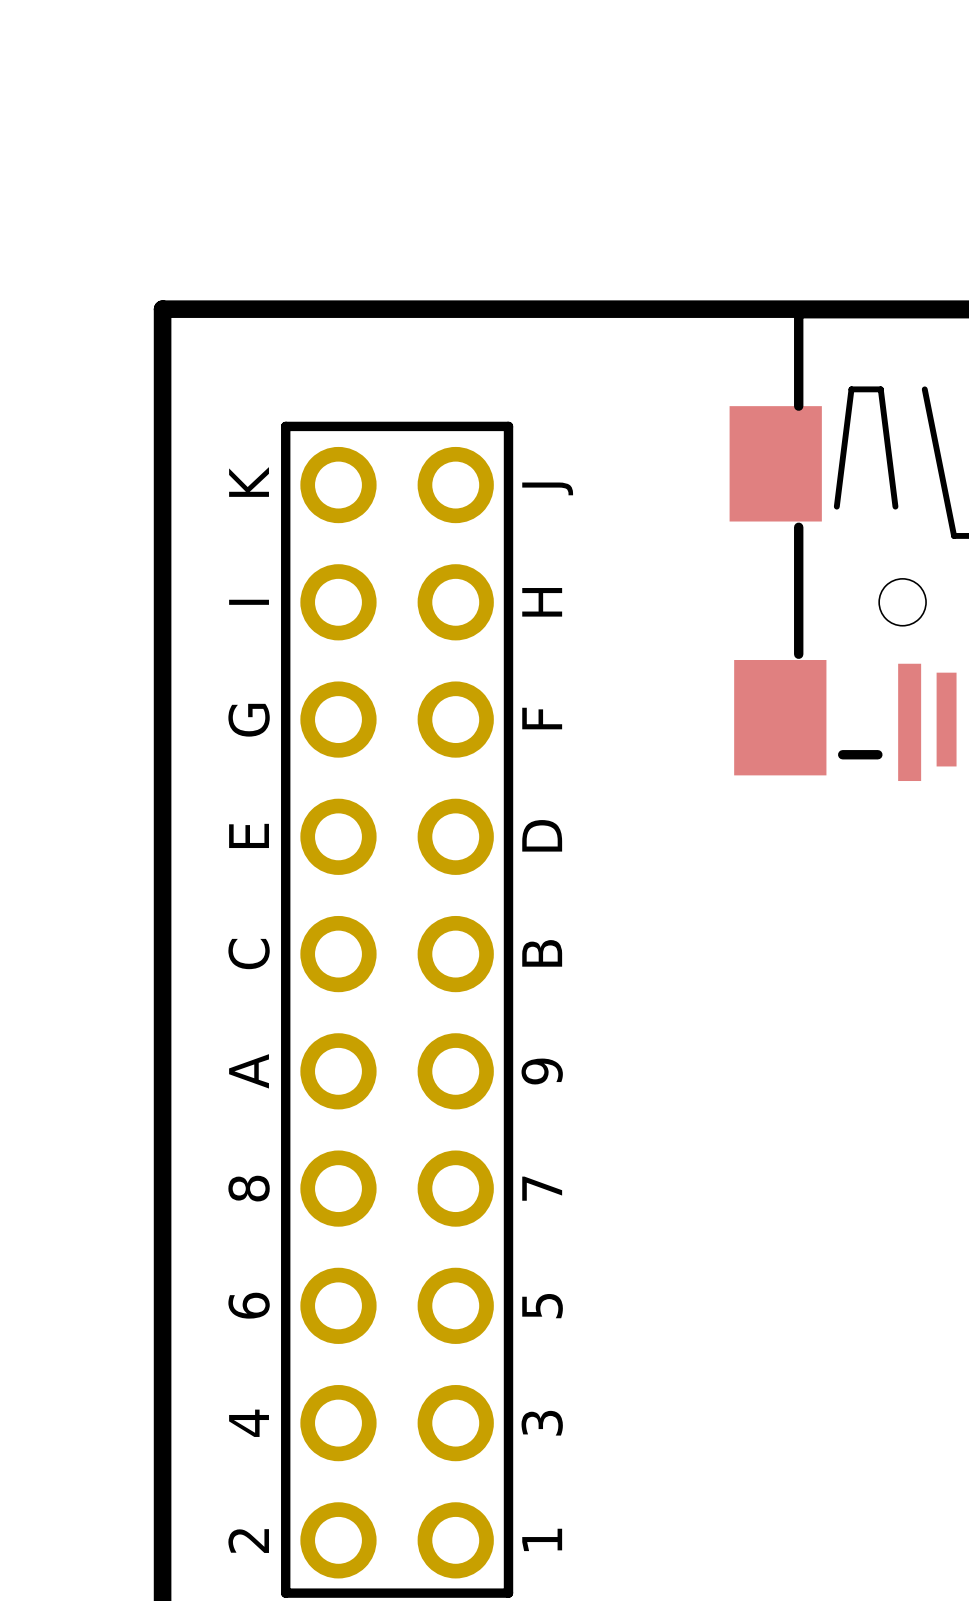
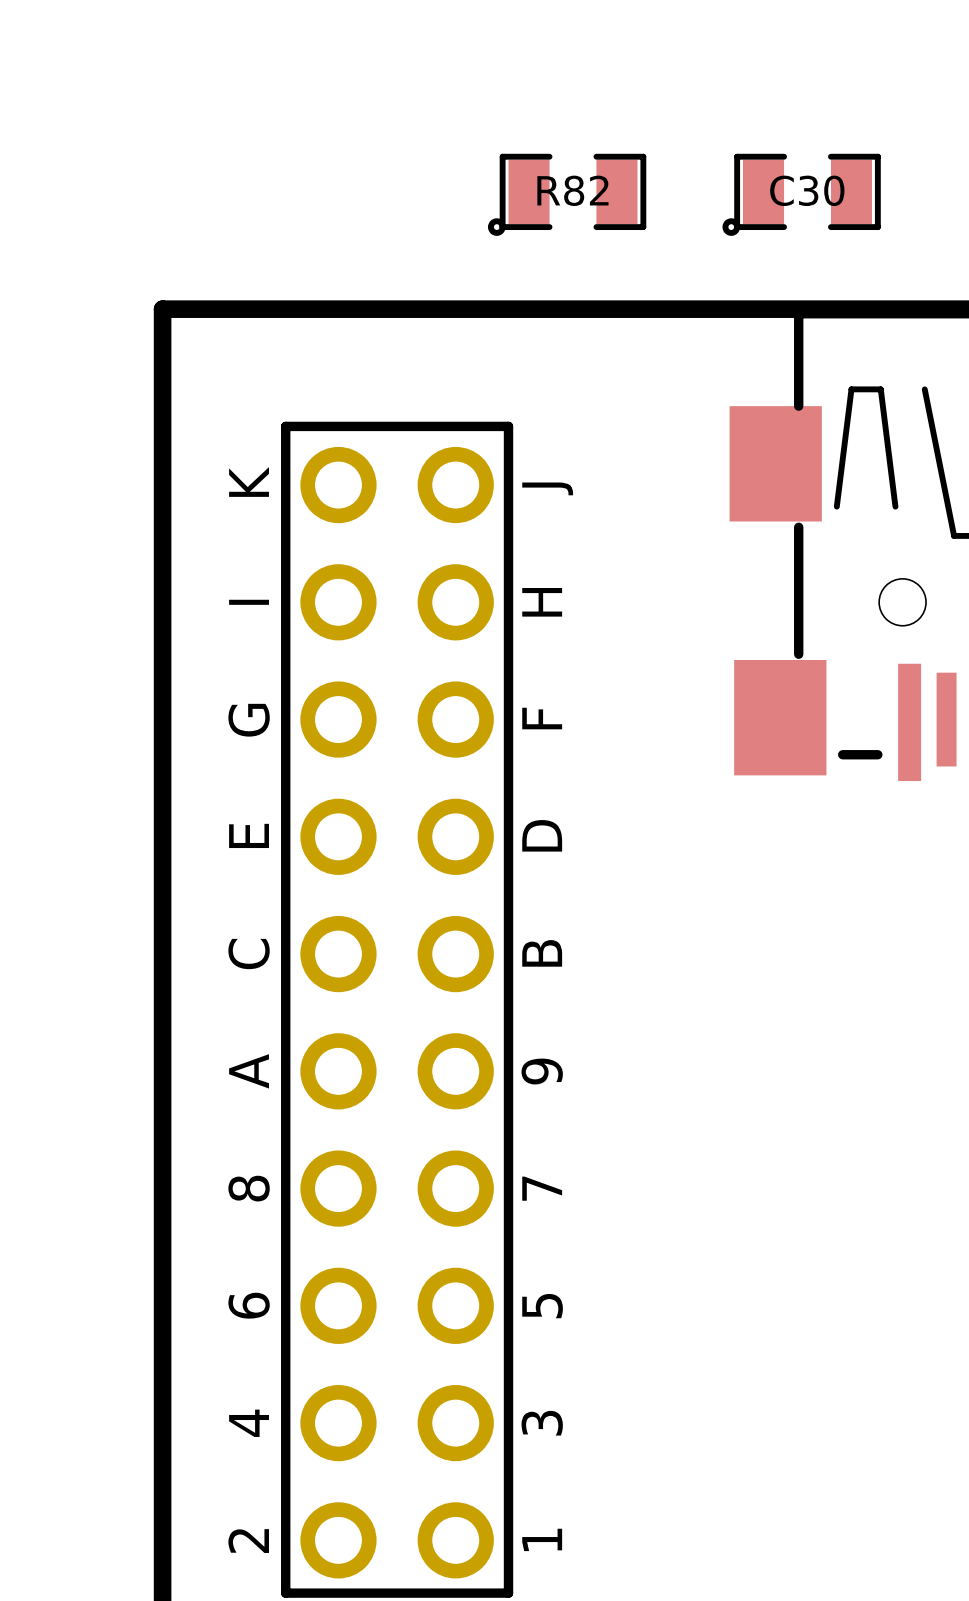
R82: none -> (567, 194)
C30: none -> (801, 194)

